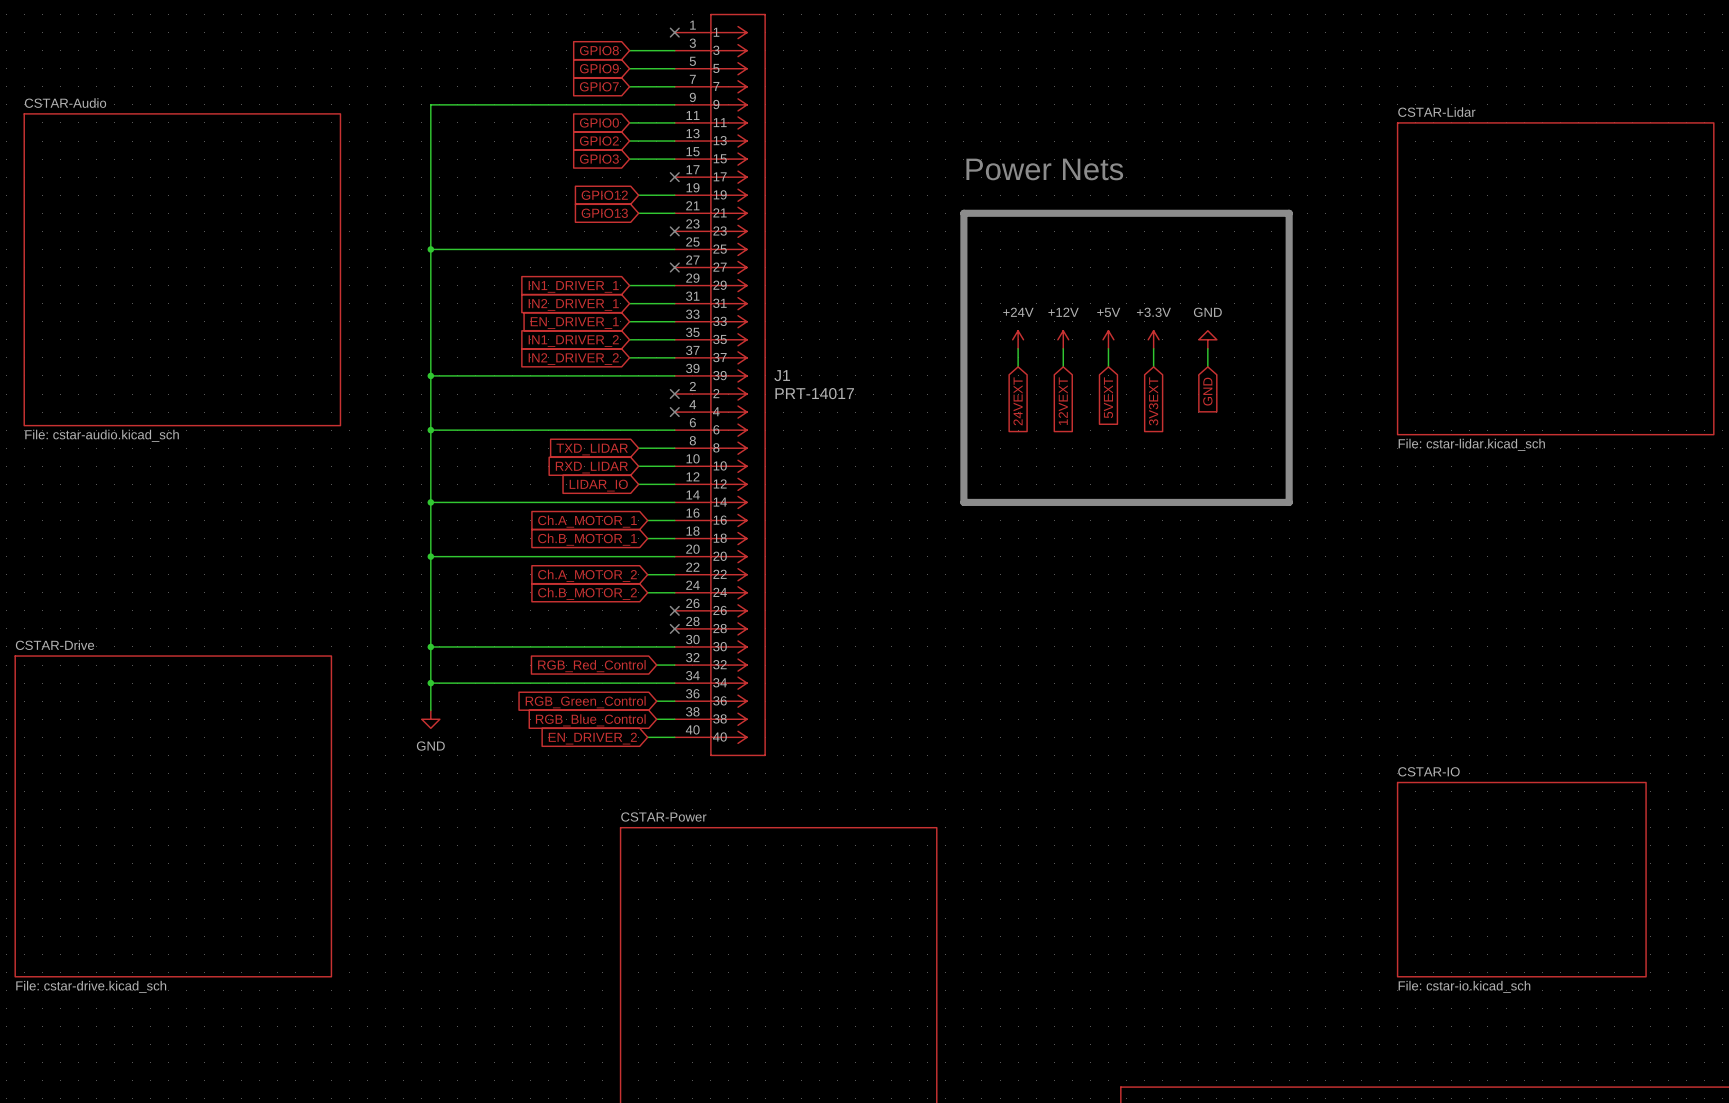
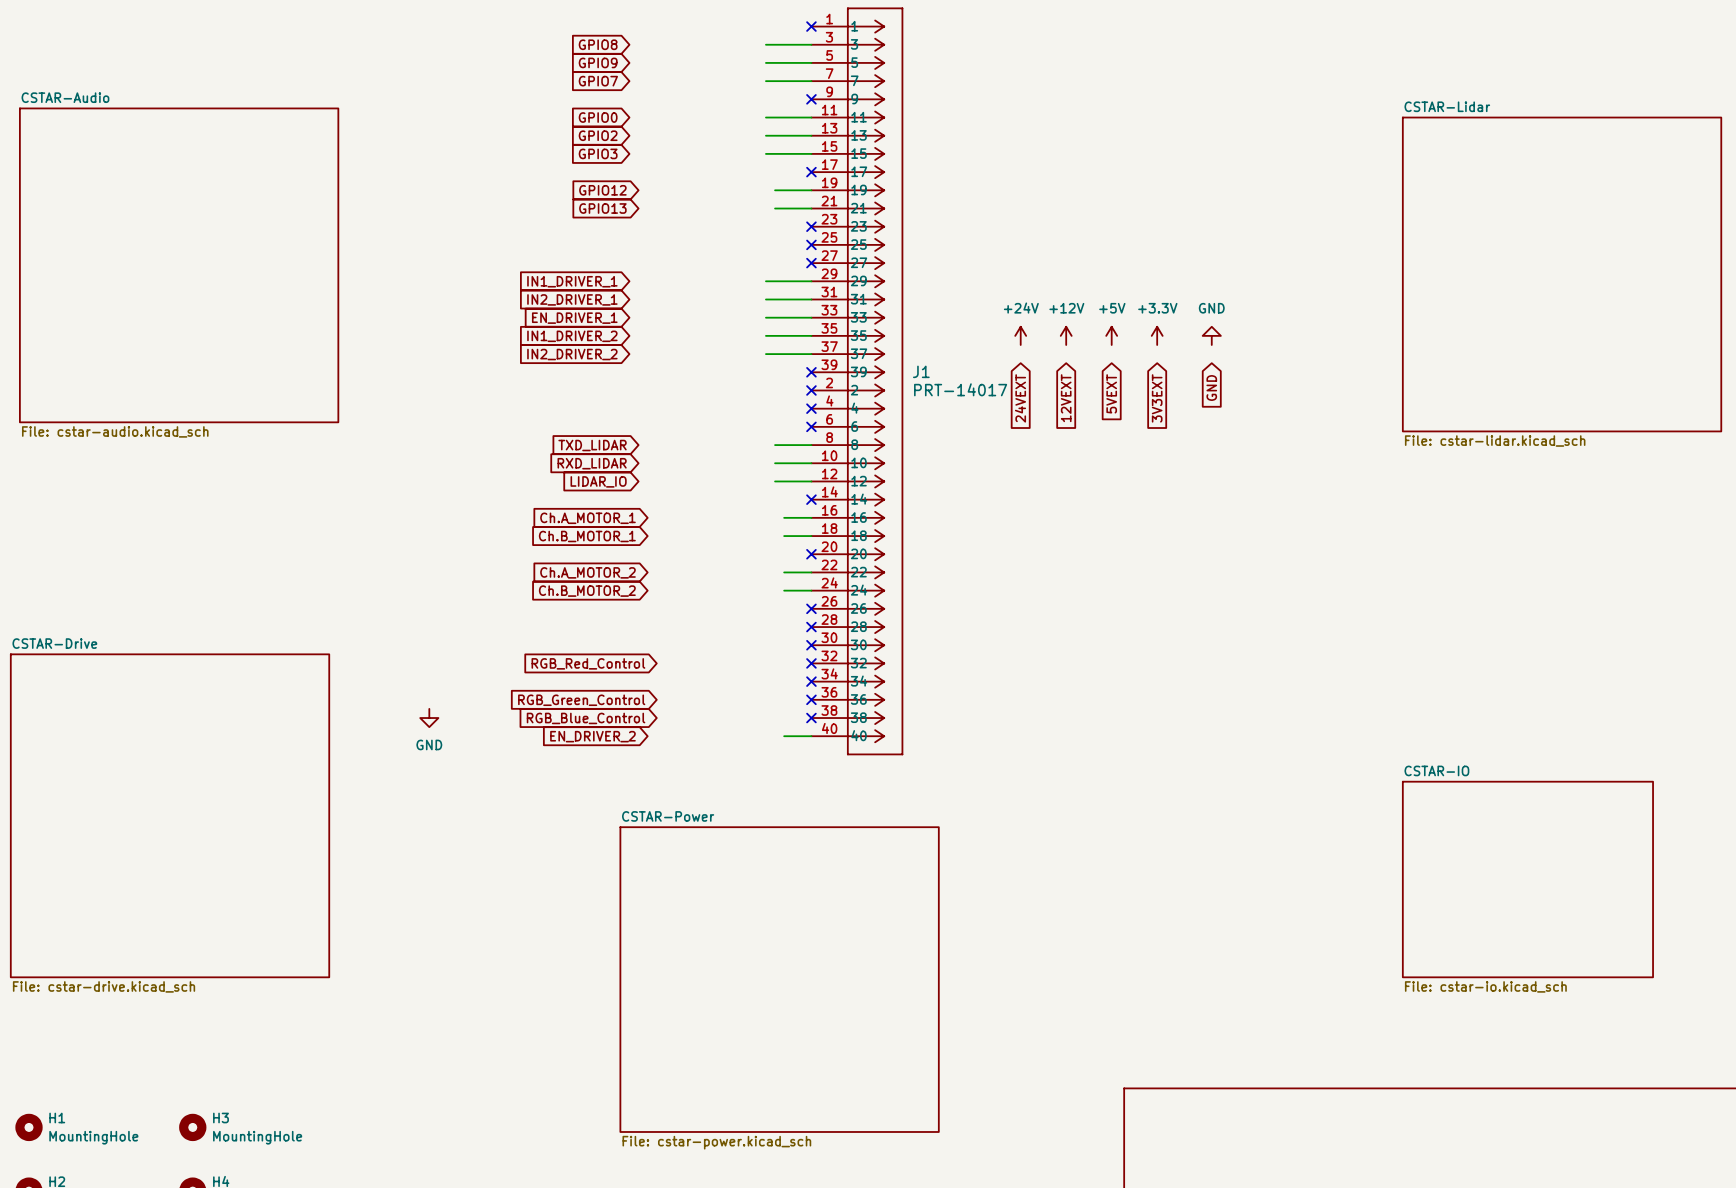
no-connect mark: (674, 32) -> none
no-connect mark: none -> (811, 26)
wire: (629, 50) (674, 50) -> (765, 44) (811, 44)
wire: (629, 68) (674, 68) -> (765, 62) (811, 62)
wire: (629, 86) (674, 86) -> (765, 81) (811, 81)
wire: (674, 104) (430, 104) (430, 710) -> none
no-connect mark: none -> (811, 99)
wire: (629, 122) (674, 122) -> (765, 117) (811, 117)
wire: (629, 141) (674, 141) -> (765, 135) (811, 135)
wire: (629, 159) (674, 159) -> (765, 153) (811, 153)
text: Power Nets (1044, 169) -> none
no-connect mark: (674, 177) -> none
no-connect mark: none -> (811, 172)
wire: (638, 195) (674, 195) -> (775, 190) (811, 190)
wire: (638, 213) (674, 213) -> (775, 208) (811, 208)
line: (963, 213) (1289, 213) (1289, 502) (963, 502) (963, 213) -> none
no-connect mark: (674, 231) -> none
no-connect mark: none -> (811, 226)
wire: (430, 249) (674, 249) -> none
junction: (430, 249) -> none
no-connect mark: none -> (811, 244)
no-connect mark: (674, 267) -> none
no-connect mark: none -> (811, 263)
wire: (629, 285) (674, 285) -> (765, 281) (811, 281)
wire: (629, 303) (674, 303) -> (765, 299) (811, 299)
wire: (629, 321) (674, 321) -> (765, 317) (811, 317)
wire: (629, 339) (674, 339) -> (765, 335) (811, 335)
wire: (1018, 348) (1018, 366) -> none
wire: (1063, 348) (1063, 366) -> none
wire: (1108, 348) (1108, 366) -> none
wire: (1153, 348) (1153, 366) -> none
wire: (1207, 348) (1207, 366) -> none
wire: (629, 357) (674, 357) -> (765, 354) (811, 354)
wire: (430, 375) (674, 375) -> none
junction: (430, 375) -> none
no-connect mark: none -> (811, 372)
J1 position: (720, 384) -> (857, 381)
no-connect mark: (674, 394) -> none
no-connect mark: none -> (811, 390)
no-connect mark: (674, 412) -> none
no-connect mark: none -> (811, 408)
wire: (430, 430) (674, 430) -> none
junction: (430, 430) -> none
no-connect mark: none -> (811, 426)
wire: (638, 448) (674, 448) -> (775, 445) (811, 445)
wire: (638, 466) (674, 466) -> (775, 463) (811, 463)
wire: (638, 484) (674, 484) -> (775, 481) (811, 481)
wire: (430, 502) (674, 502) -> none
junction: (430, 502) -> none
no-connect mark: none -> (811, 499)
wire: (647, 520) (674, 520) -> (784, 517) (811, 517)
wire: (647, 538) (674, 538) -> (784, 536) (811, 536)
wire: (430, 556) (674, 556) -> none
junction: (430, 556) -> none
no-connect mark: none -> (811, 554)
wire: (647, 574) (674, 574) -> (784, 572) (811, 572)
wire: (647, 592) (674, 592) -> (784, 590) (811, 590)
no-connect mark: (674, 610) -> none
no-connect mark: none -> (811, 608)
no-connect mark: (674, 628) -> none
no-connect mark: none -> (811, 627)
wire: (430, 646) (674, 646) -> none
junction: (430, 646) -> none
no-connect mark: none -> (811, 645)
wire: (656, 665) (674, 665) -> none
no-connect mark: none -> (811, 663)
wire: (430, 683) (674, 683) -> none
junction: (430, 683) -> none
no-connect mark: none -> (811, 681)
wire: (656, 701) (674, 701) -> none
no-connect mark: none -> (811, 699)
wire: (656, 719) (674, 719) -> none
no-connect mark: none -> (811, 718)
wire: (647, 737) (674, 737) -> (784, 736) (811, 736)

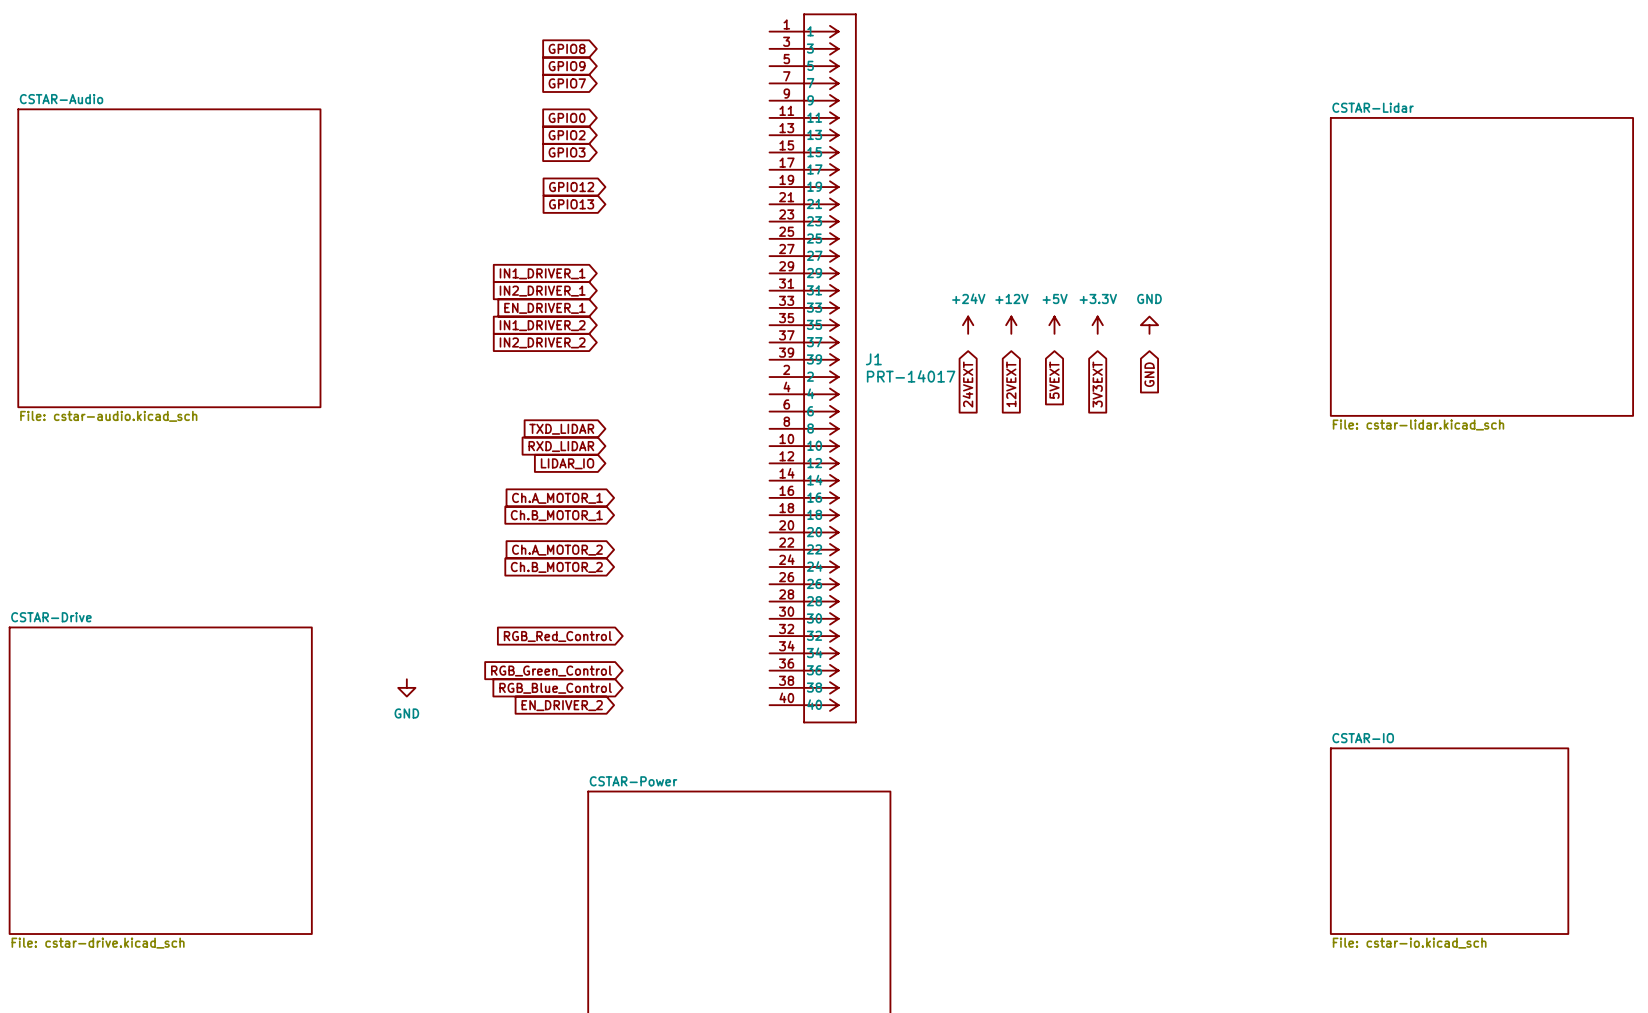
no-connect mark: (811, 26) -> none
wire: (765, 44) (811, 44) -> none
wire: (765, 62) (811, 62) -> none
wire: (765, 81) (811, 81) -> none
no-connect mark: (811, 99) -> none
wire: (765, 117) (811, 117) -> none
wire: (765, 135) (811, 135) -> none
wire: (765, 153) (811, 153) -> none
no-connect mark: (811, 172) -> none
wire: (775, 190) (811, 190) -> none
wire: (775, 208) (811, 208) -> none
no-connect mark: (811, 226) -> none
no-connect mark: (811, 244) -> none
no-connect mark: (811, 263) -> none
wire: (765, 281) (811, 281) -> none
wire: (765, 299) (811, 299) -> none
wire: (765, 317) (811, 317) -> none
wire: (765, 335) (811, 335) -> none
wire: (765, 354) (811, 354) -> none
no-connect mark: (811, 372) -> none
no-connect mark: (811, 390) -> none
no-connect mark: (811, 408) -> none
no-connect mark: (811, 426) -> none
wire: (775, 445) (811, 445) -> none
wire: (775, 463) (811, 463) -> none
wire: (775, 481) (811, 481) -> none
no-connect mark: (811, 499) -> none
wire: (784, 517) (811, 517) -> none
wire: (784, 536) (811, 536) -> none
no-connect mark: (811, 554) -> none
wire: (784, 572) (811, 572) -> none
wire: (784, 590) (811, 590) -> none
no-connect mark: (811, 608) -> none
no-connect mark: (811, 627) -> none
no-connect mark: (811, 645) -> none
no-connect mark: (811, 663) -> none
no-connect mark: (811, 681) -> none
no-connect mark: (811, 699) -> none
no-connect mark: (811, 718) -> none
wire: (784, 736) (811, 736) -> none

